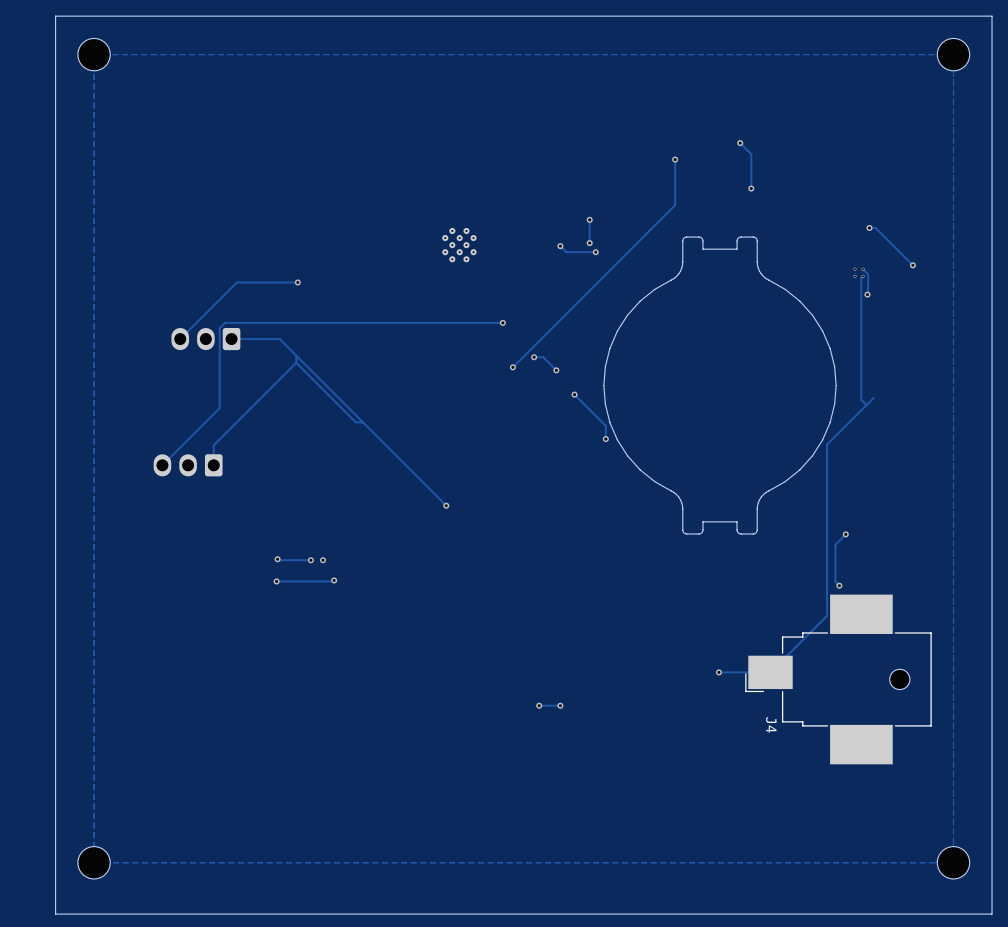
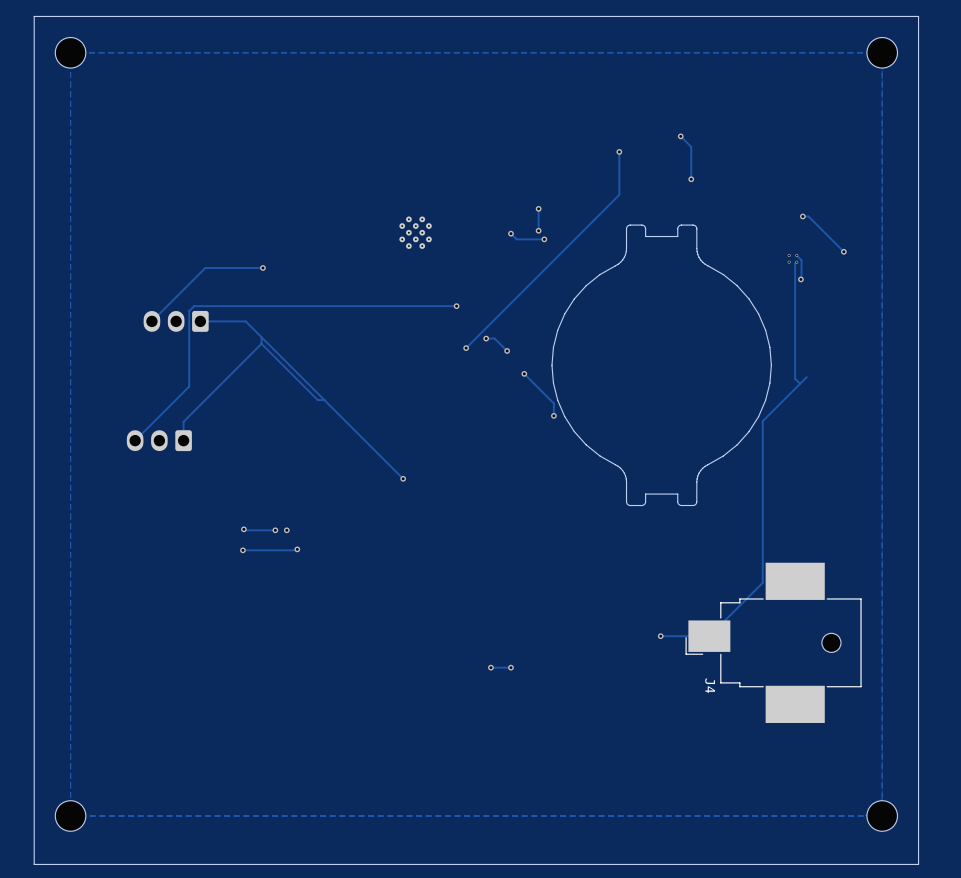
track: (845, 534) (835, 544) (835, 581) (839, 585) -> none
via: (845, 534) -> none
via: (839, 585) -> none

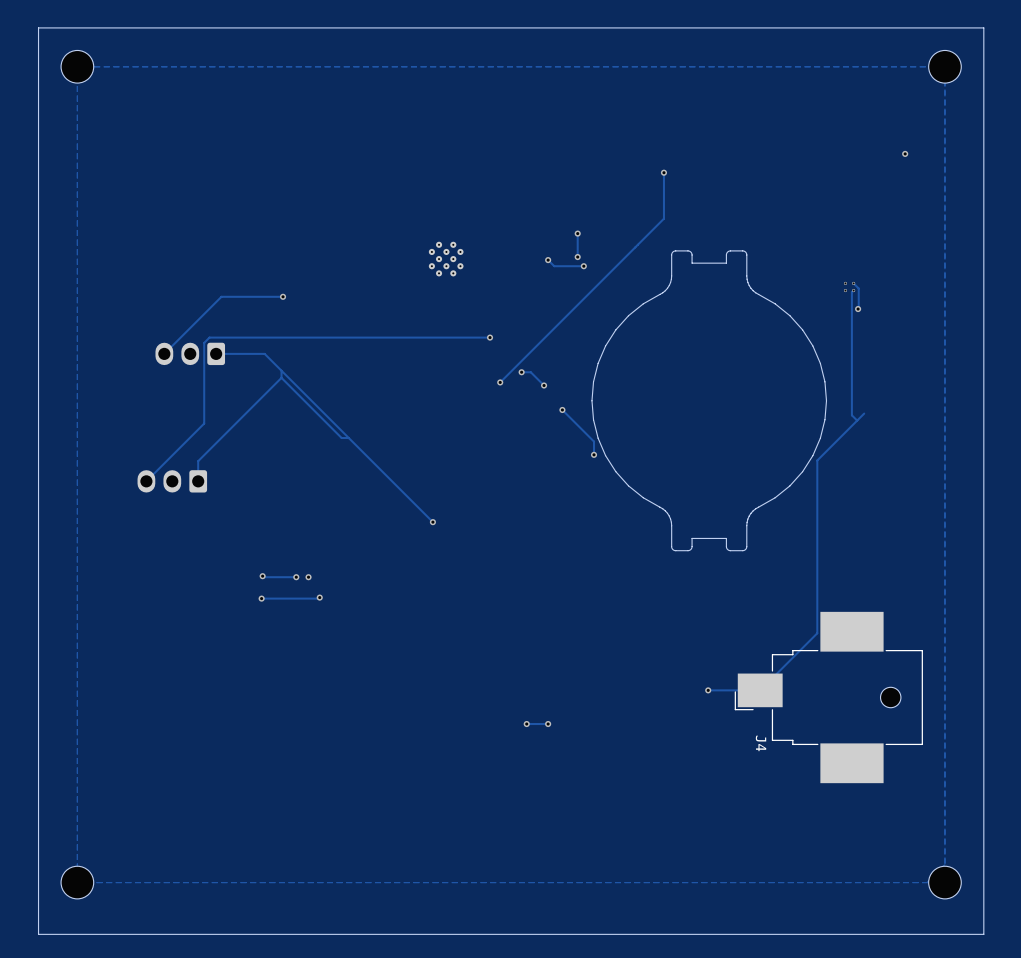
via: none -> (905, 153)
track: (680, 136) (691, 146) (691, 179) -> none
via: (680, 136) -> none
via: (691, 179) -> none
track: (802, 216) (808, 216) (843, 251) -> none
via: (802, 216) -> none
via: (843, 251) -> none

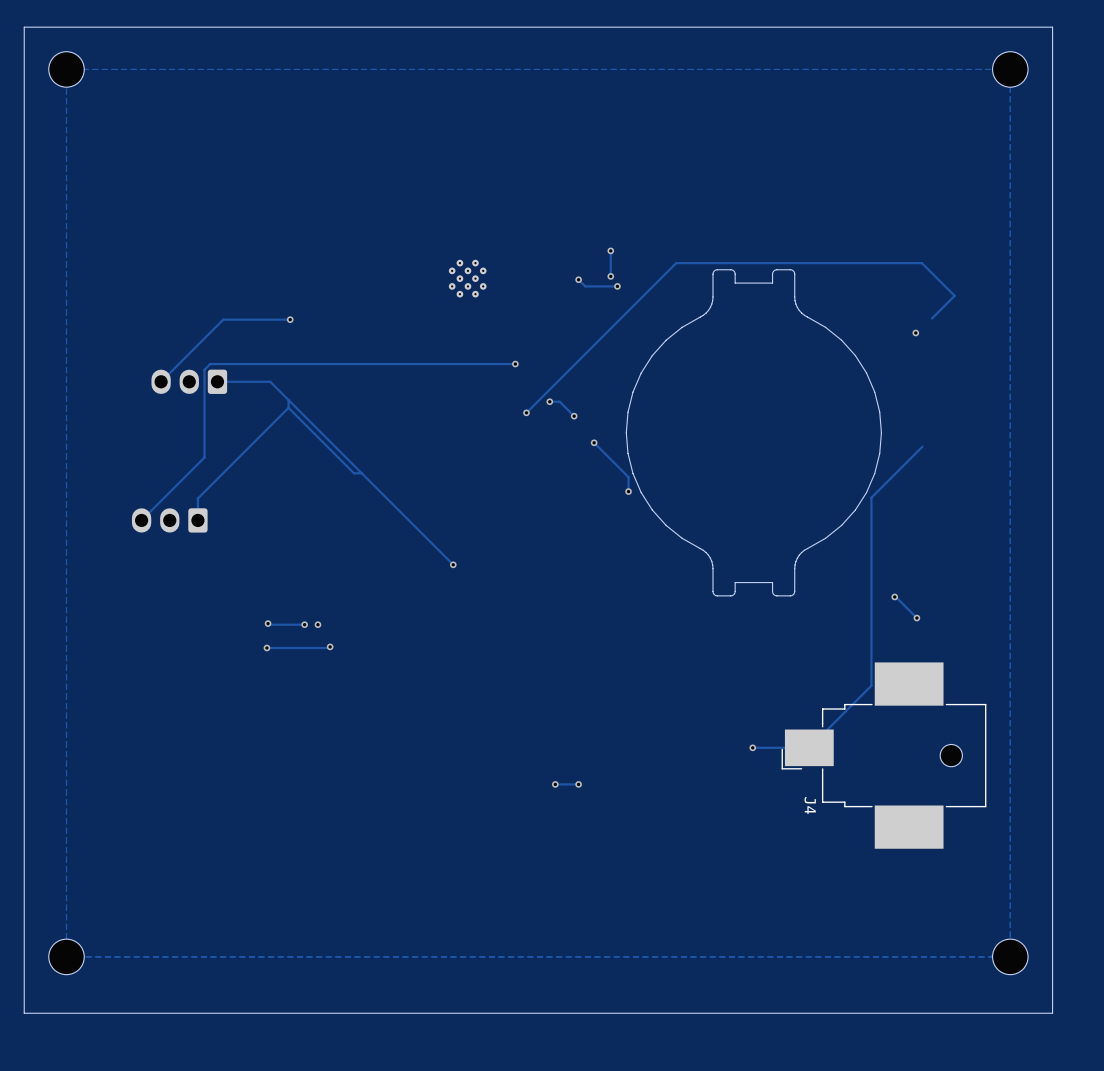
via: (905, 153) -> none
track: (663, 172) (663, 218) (637, 244) -> (931, 318) (954, 295) (921, 263) (676, 263)
via: (663, 172) -> none
track: (853, 283) (858, 288) (858, 309) -> none
part: (849, 286) -> none
track: (853, 290) (851, 292) (851, 415) (857, 420) -> none
track: none -> (894, 596) (916, 618)
via: none -> (894, 596)
via: none -> (916, 618)

